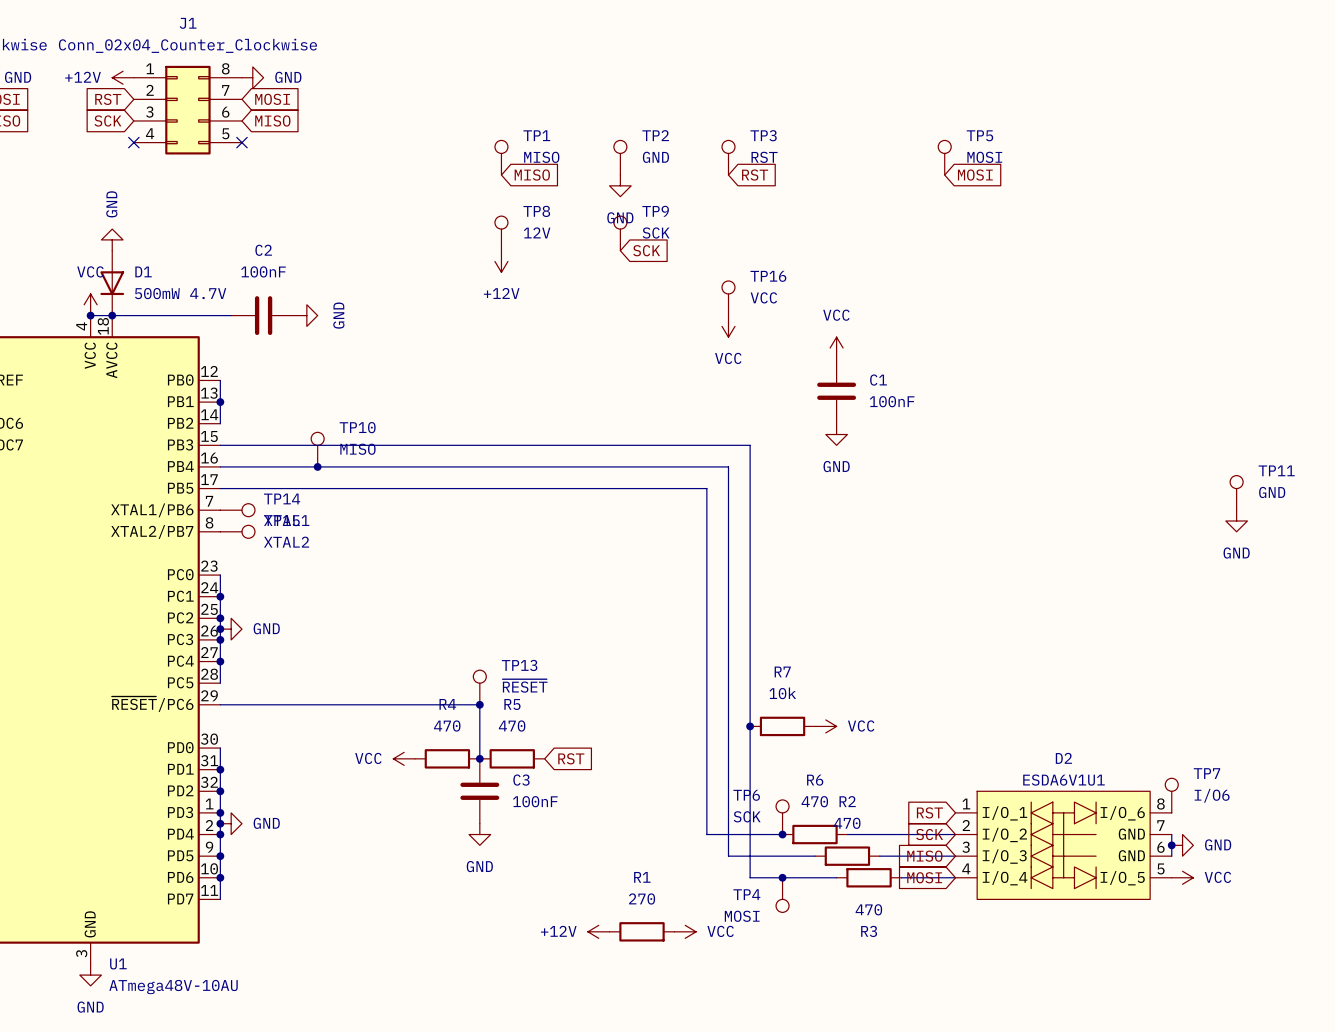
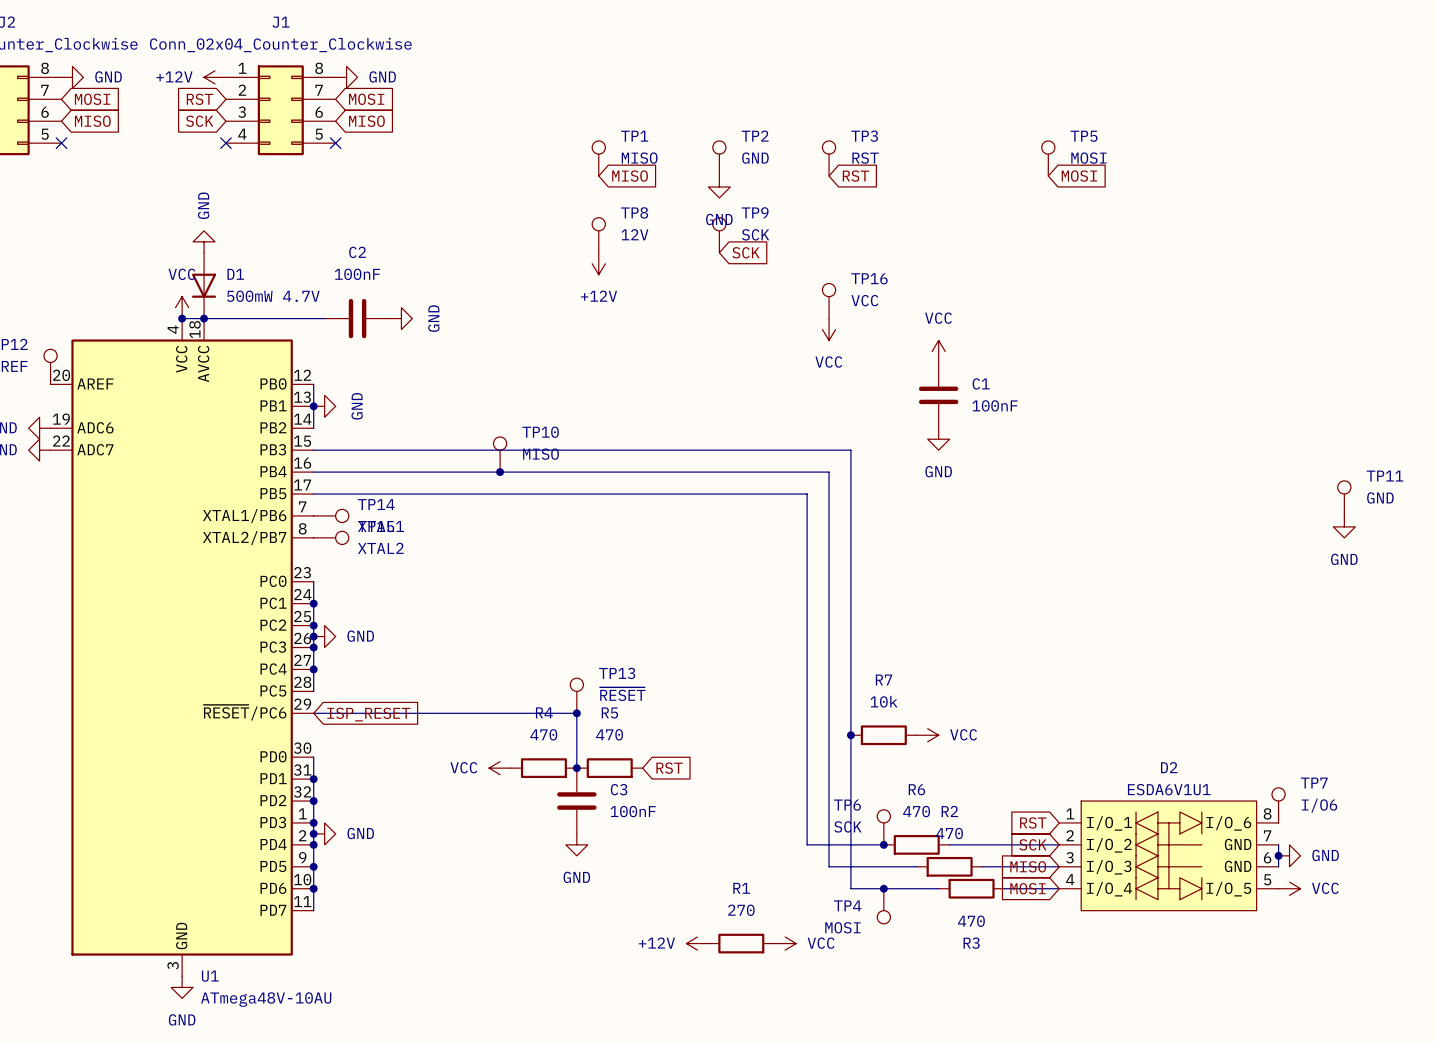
power symbol: none -> GND (324, 406)
TP10 position: (317, 449) -> (500, 454)
junction: (317, 466) -> none
junction: none -> (500, 472)
global label: none -> ISP_RESET (368, 714)

